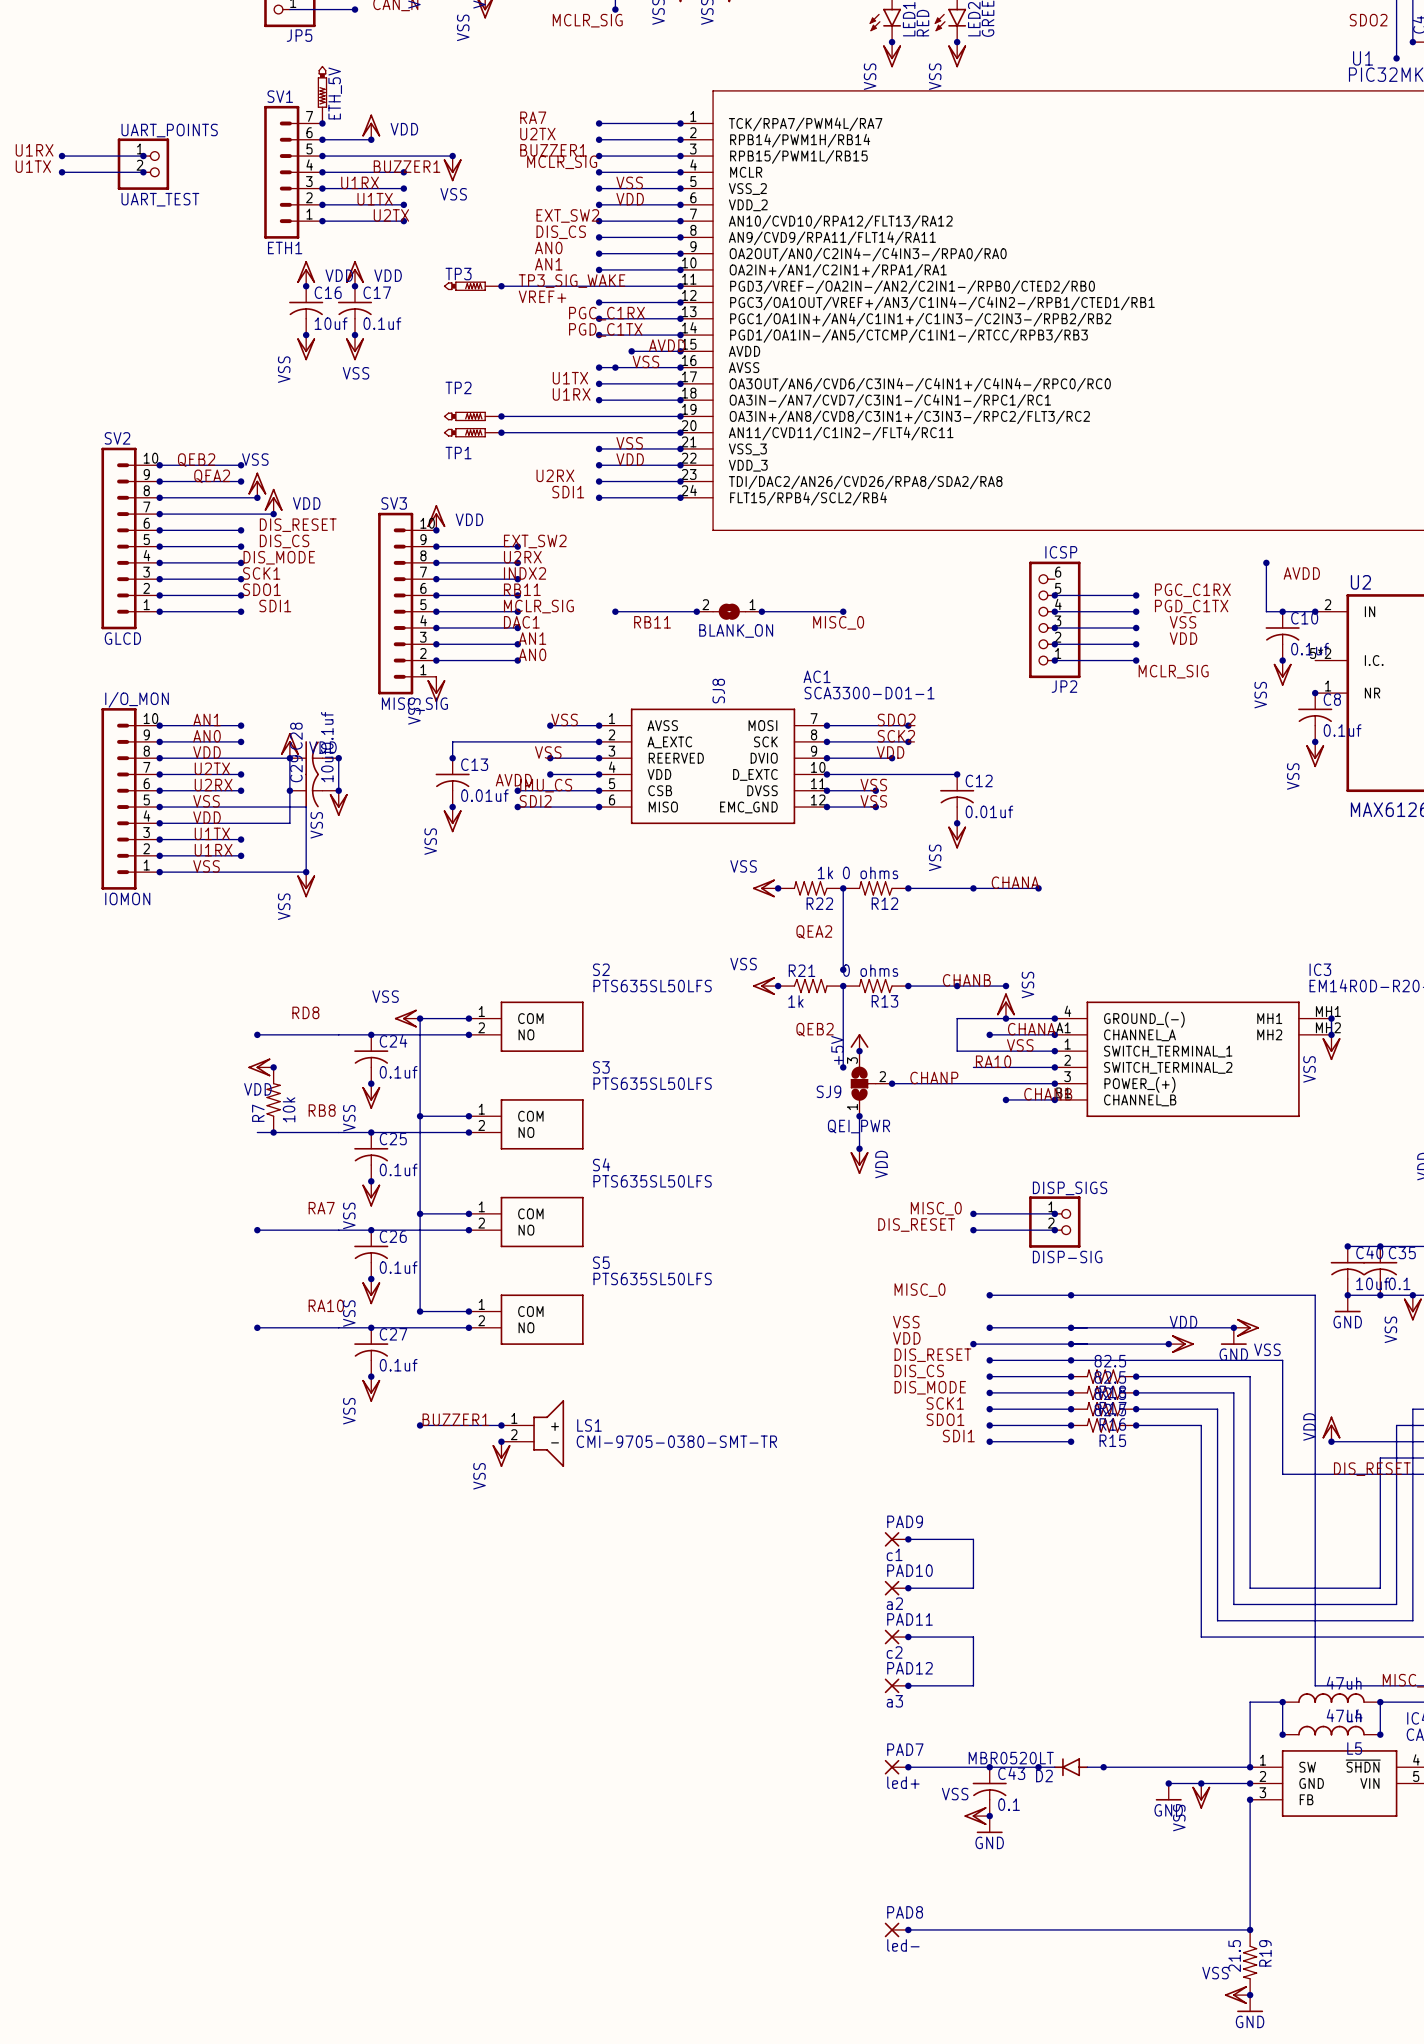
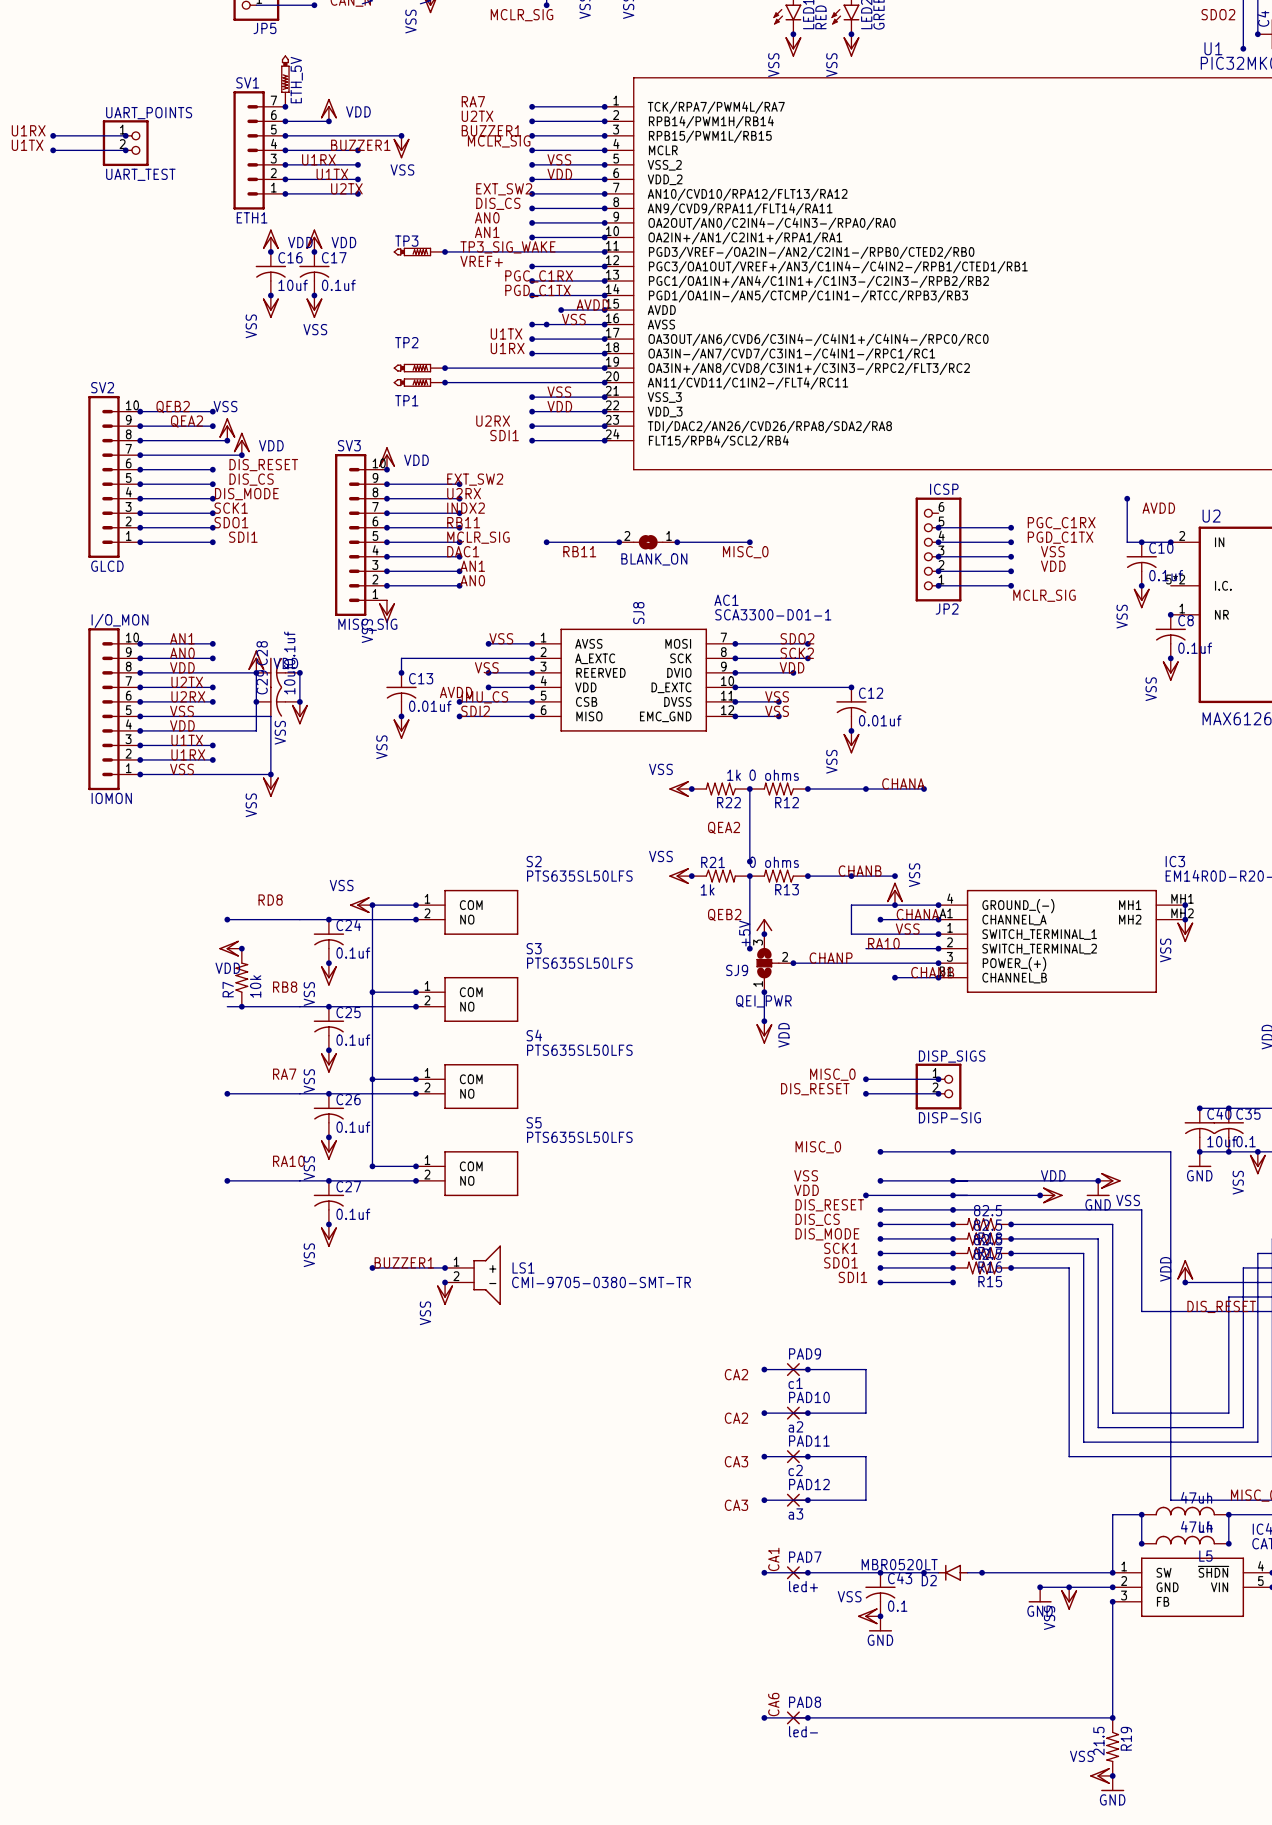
wire: none -> (764, 1369) (807, 1369)
junction: none -> (764, 1369)
label: none -> CA2 (736, 1374)
wire: none -> (764, 1413) (807, 1413)
junction: none -> (764, 1413)
label: none -> CA2 (736, 1418)
wire: none -> (764, 1456) (807, 1456)
junction: none -> (764, 1456)
label: none -> CA3 (736, 1461)
wire: none -> (764, 1500) (807, 1500)
junction: none -> (764, 1500)
label: none -> CA3 (736, 1505)
label: none -> CA1 (773, 1559)
wire: none -> (764, 1572) (807, 1572)
junction: none -> (764, 1572)
label: none -> CA6 (773, 1704)
wire: none -> (764, 1717) (807, 1717)
junction: none -> (764, 1717)

